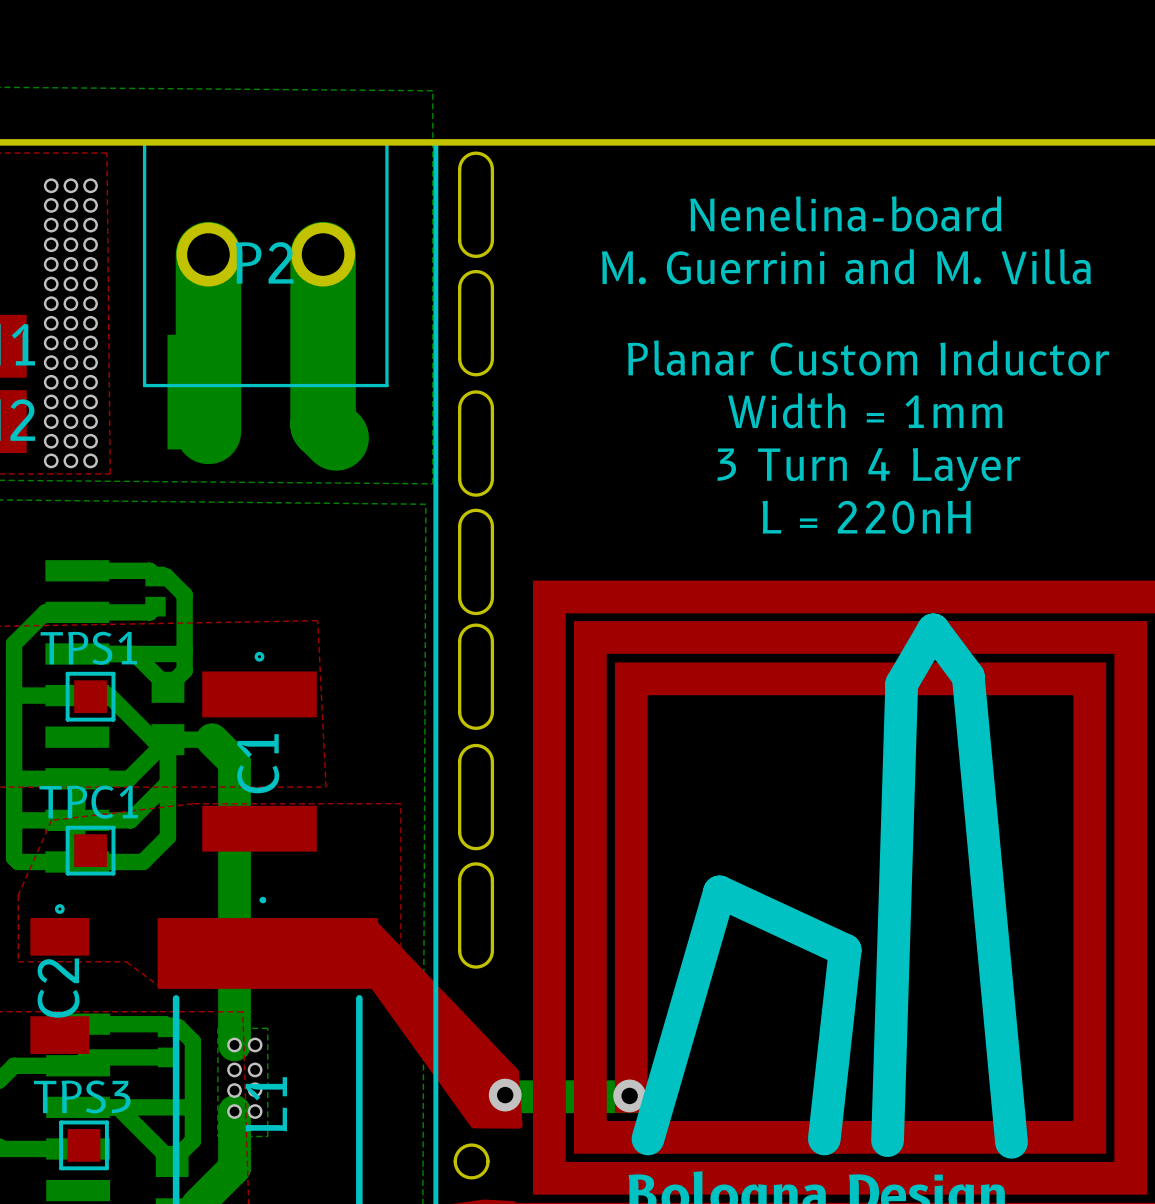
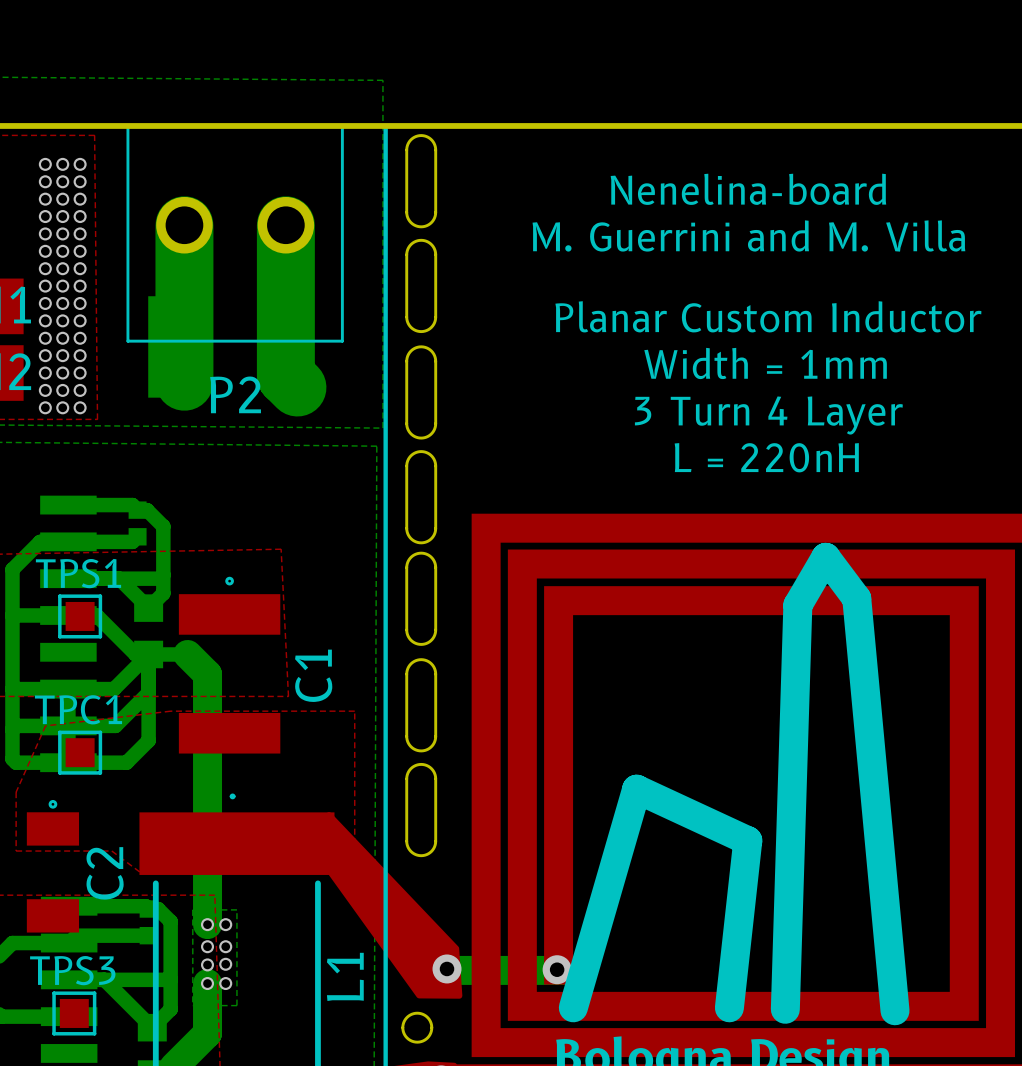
P2 name position: P2 (264, 262) -> P2 (235, 394)
C1 name position: C1 (258, 763) -> C1 (313, 675)
C2 name position: C2 (58, 988) -> C2 (105, 873)
L1 name position: L1 (266, 1104) -> L1 (345, 976)

